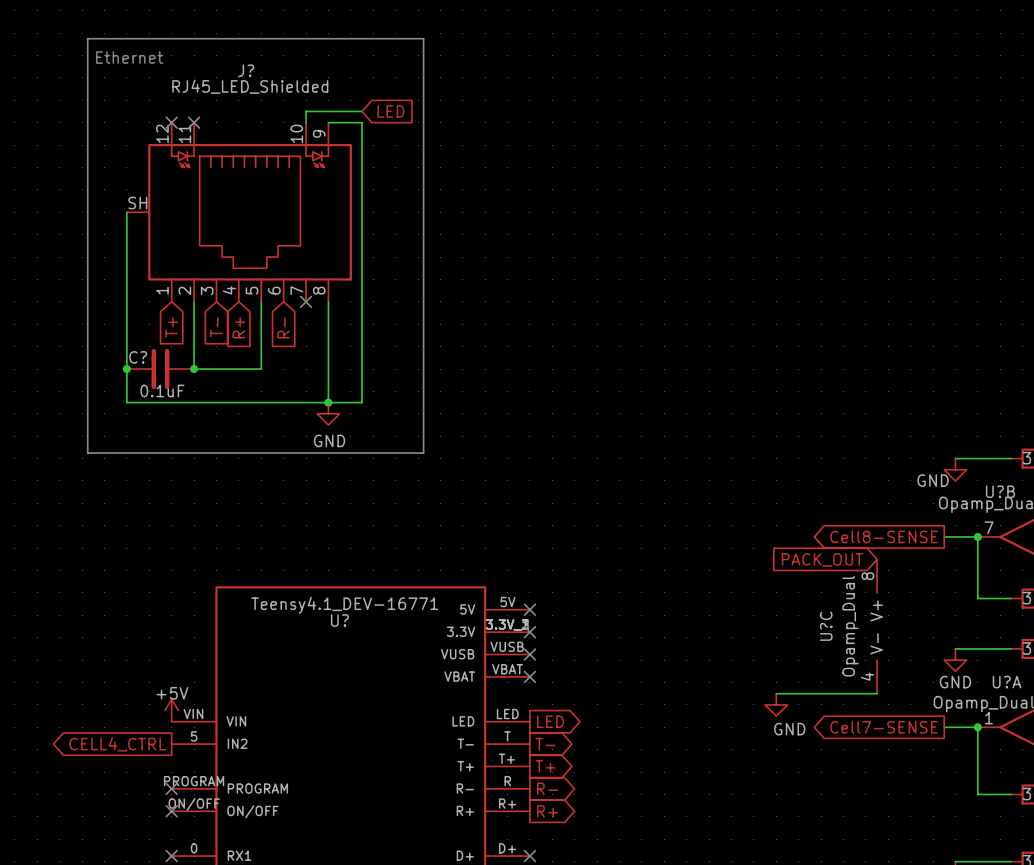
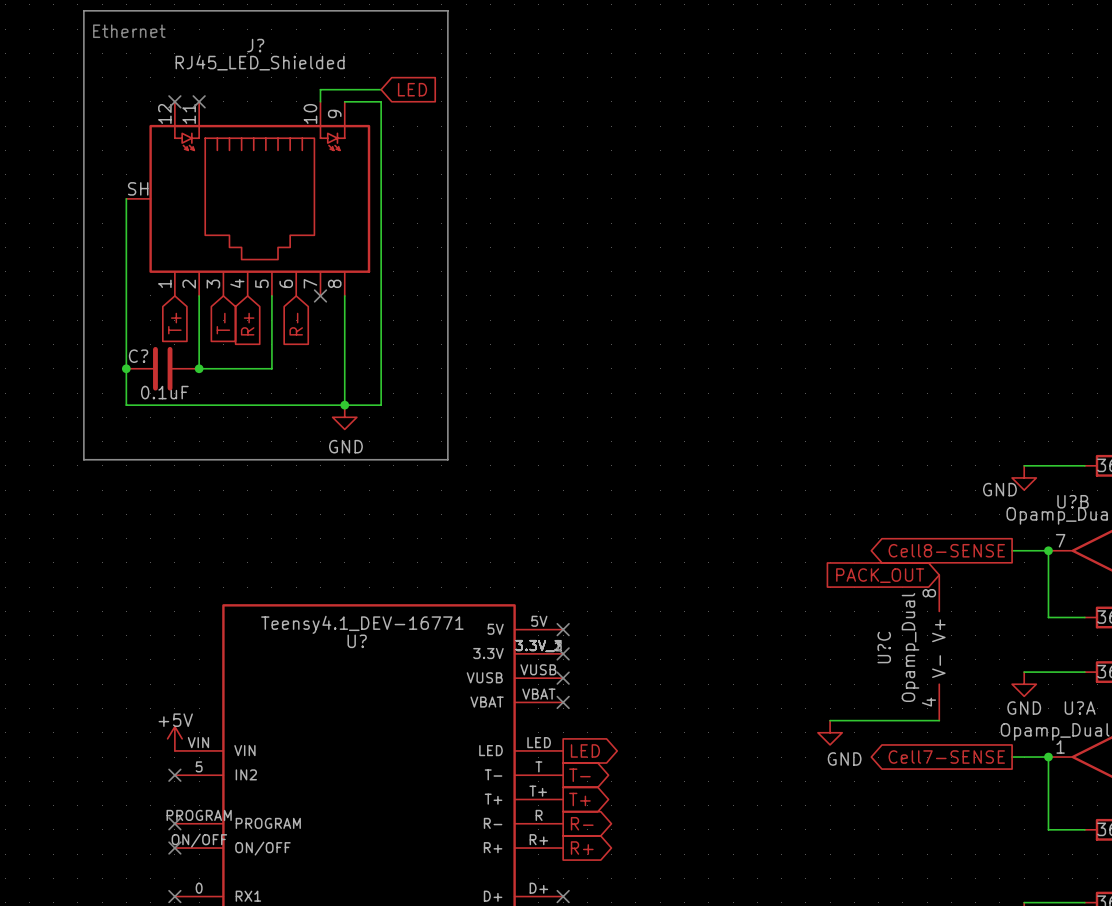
global label: CELL4_CTRL (117, 744) -> none
no-connect mark: none -> (174, 775)

